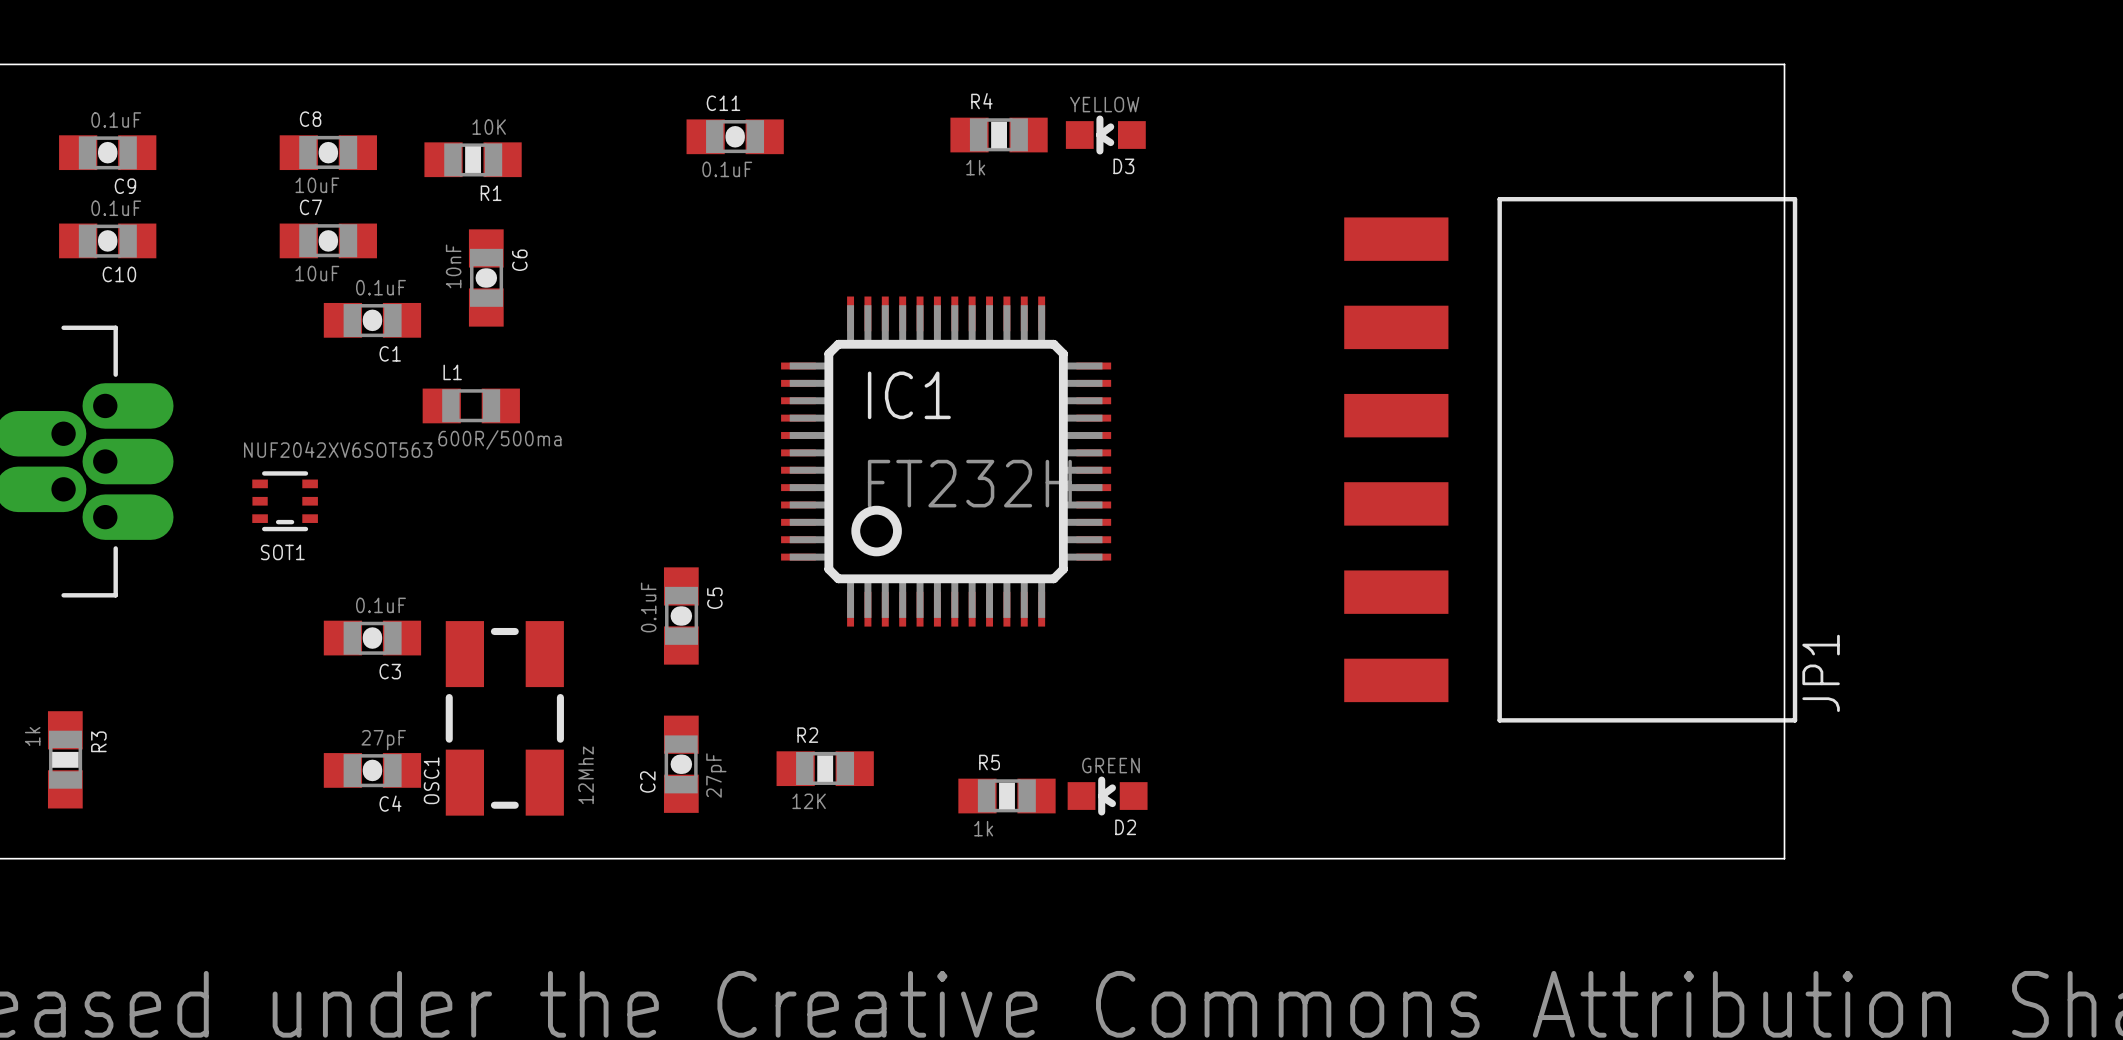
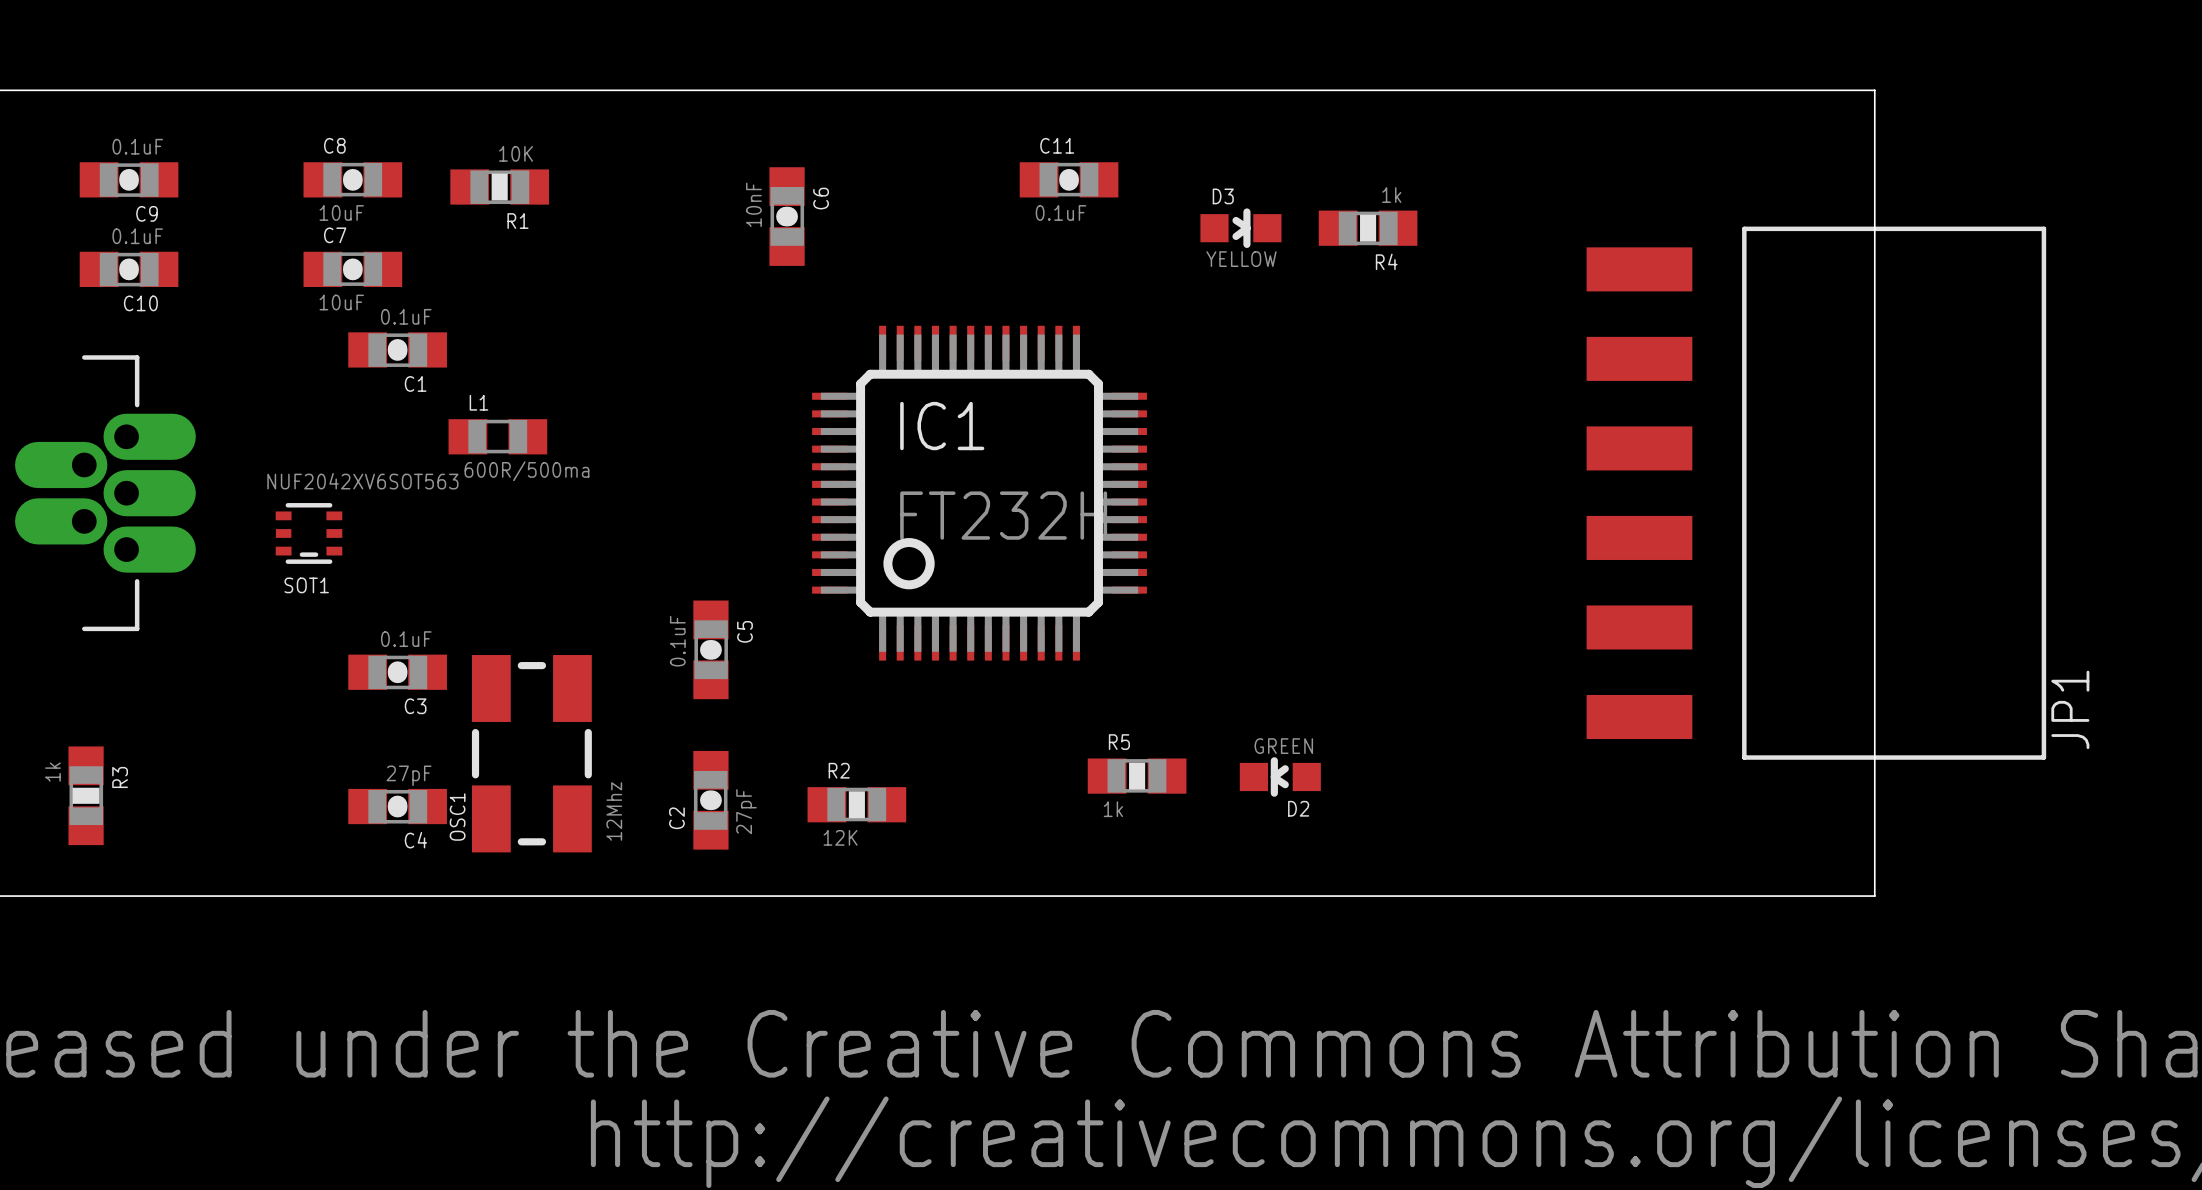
board edge: (1784, 64) (1784, 858) -> (1830, 90) (1874, 90) (1874, 896) (1830, 896)
R4 name position: R4 (981, 101) -> R4 (1386, 261)
R4 position: (999, 135) -> (1368, 228)
D3 rotation: 0° (1105, 135) -> 180° (1240, 228)
D3 position: (1105, 135) -> (1240, 228)
C11 position: (735, 136) -> (1069, 179)
R4 value position: 1k (975, 167) -> 1k (1391, 195)
C6 position: (486, 277) -> (787, 216)
JP1 position: (1570, 459) -> (1816, 493)
R5 position: (1006, 796) -> (1137, 776)
D2 position: (1107, 796) -> (1280, 776)

